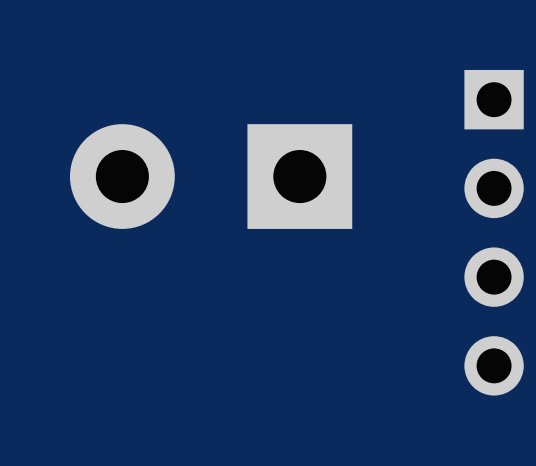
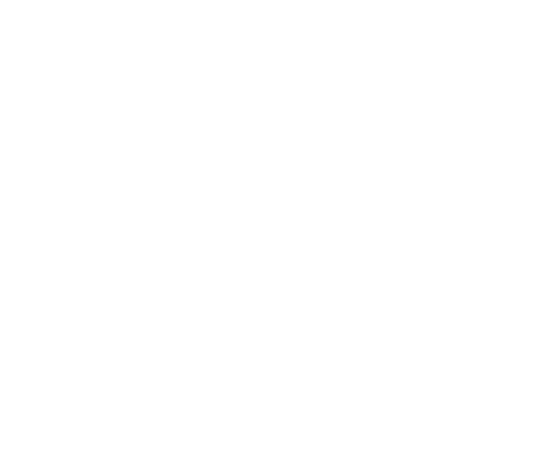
part: (211, 176) -> none
part: (494, 232) -> none

